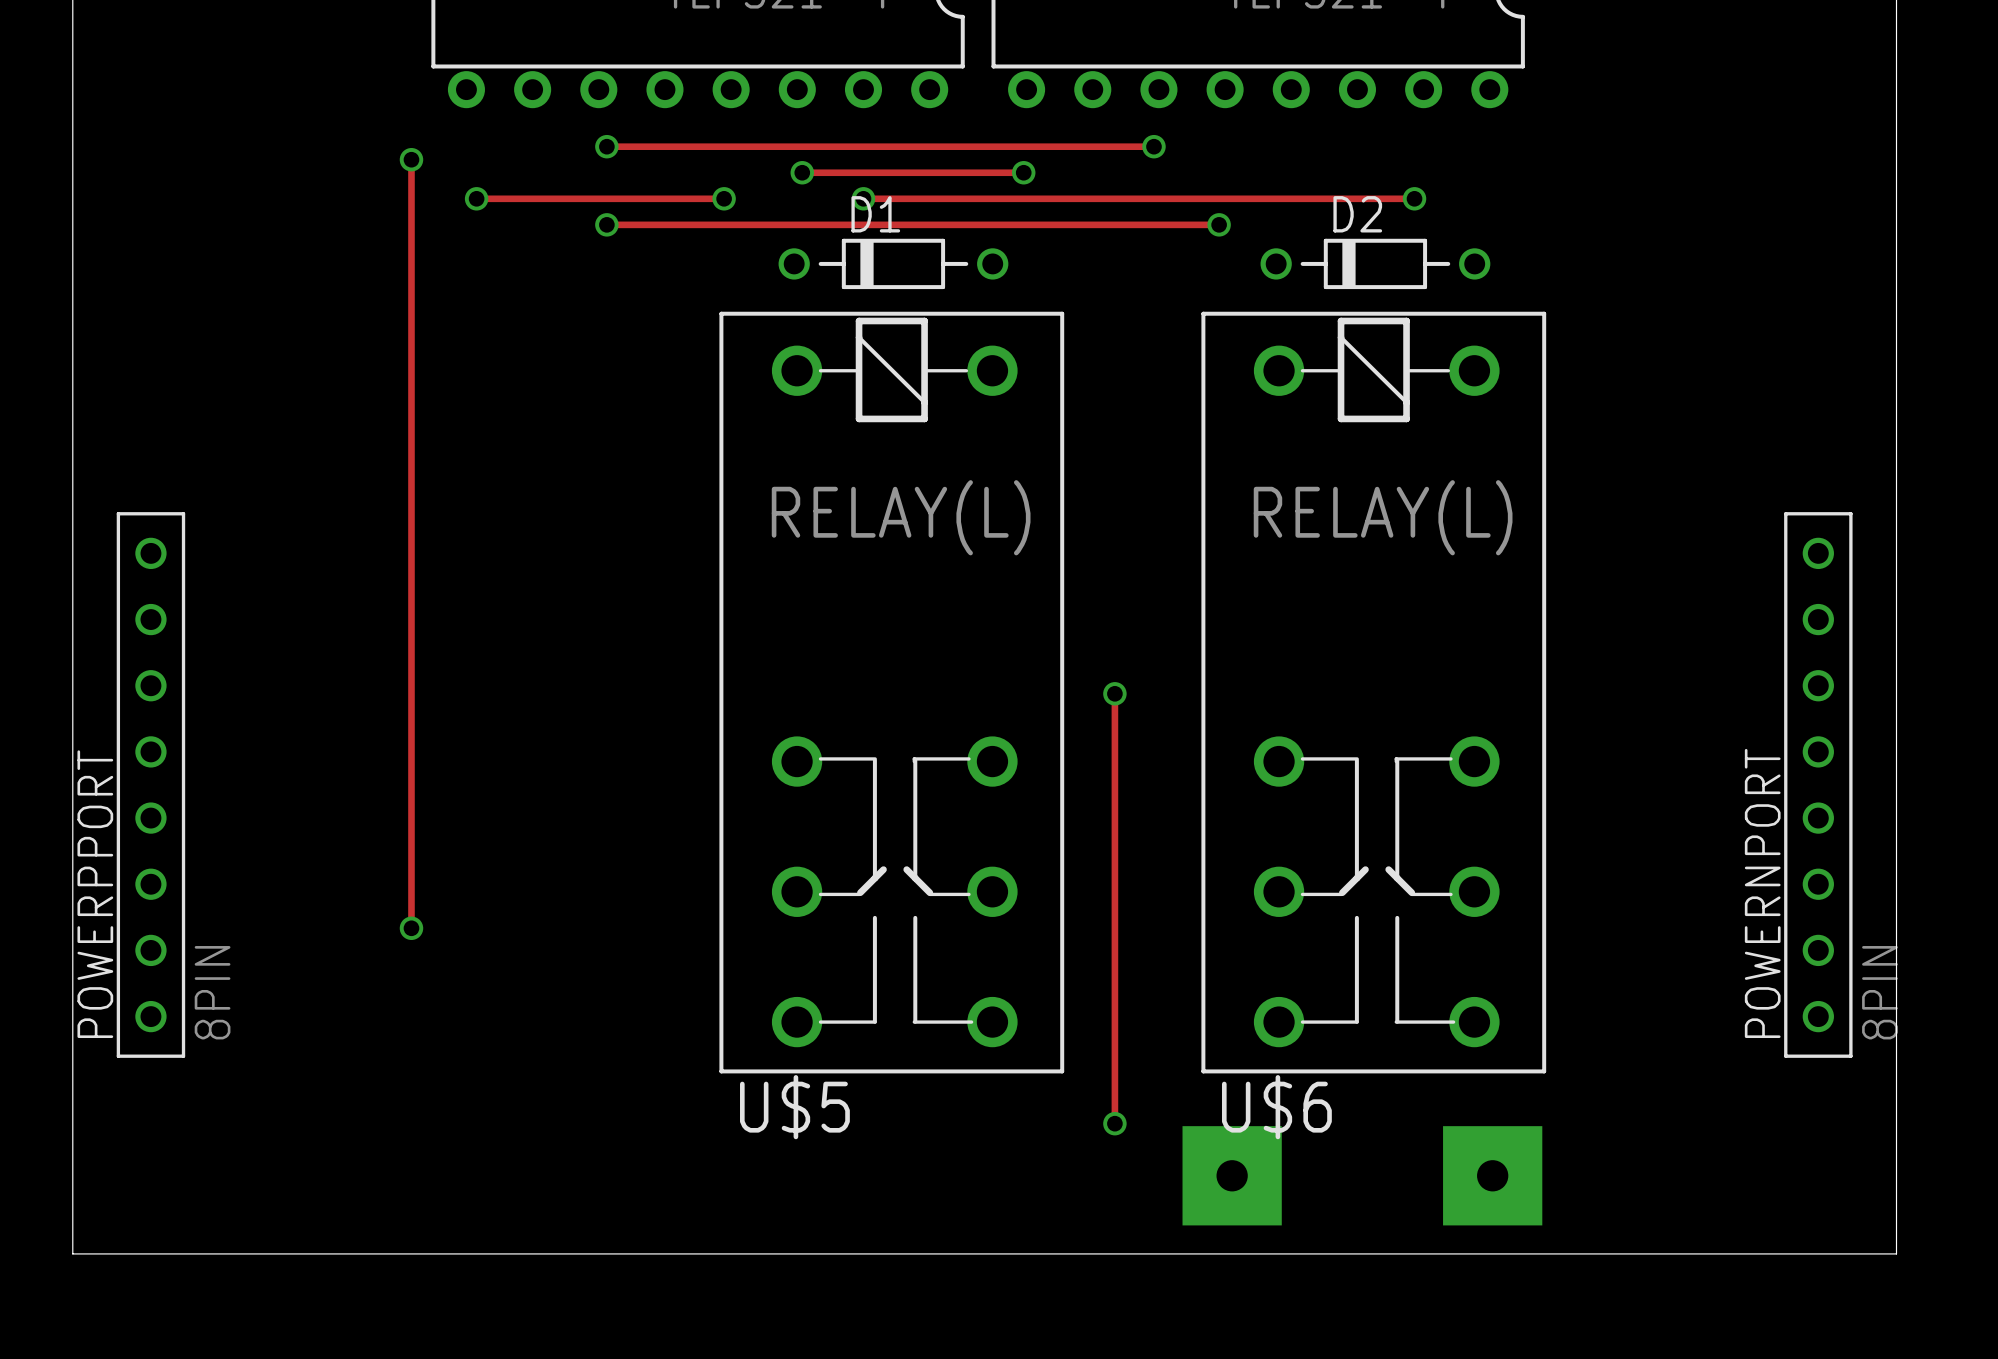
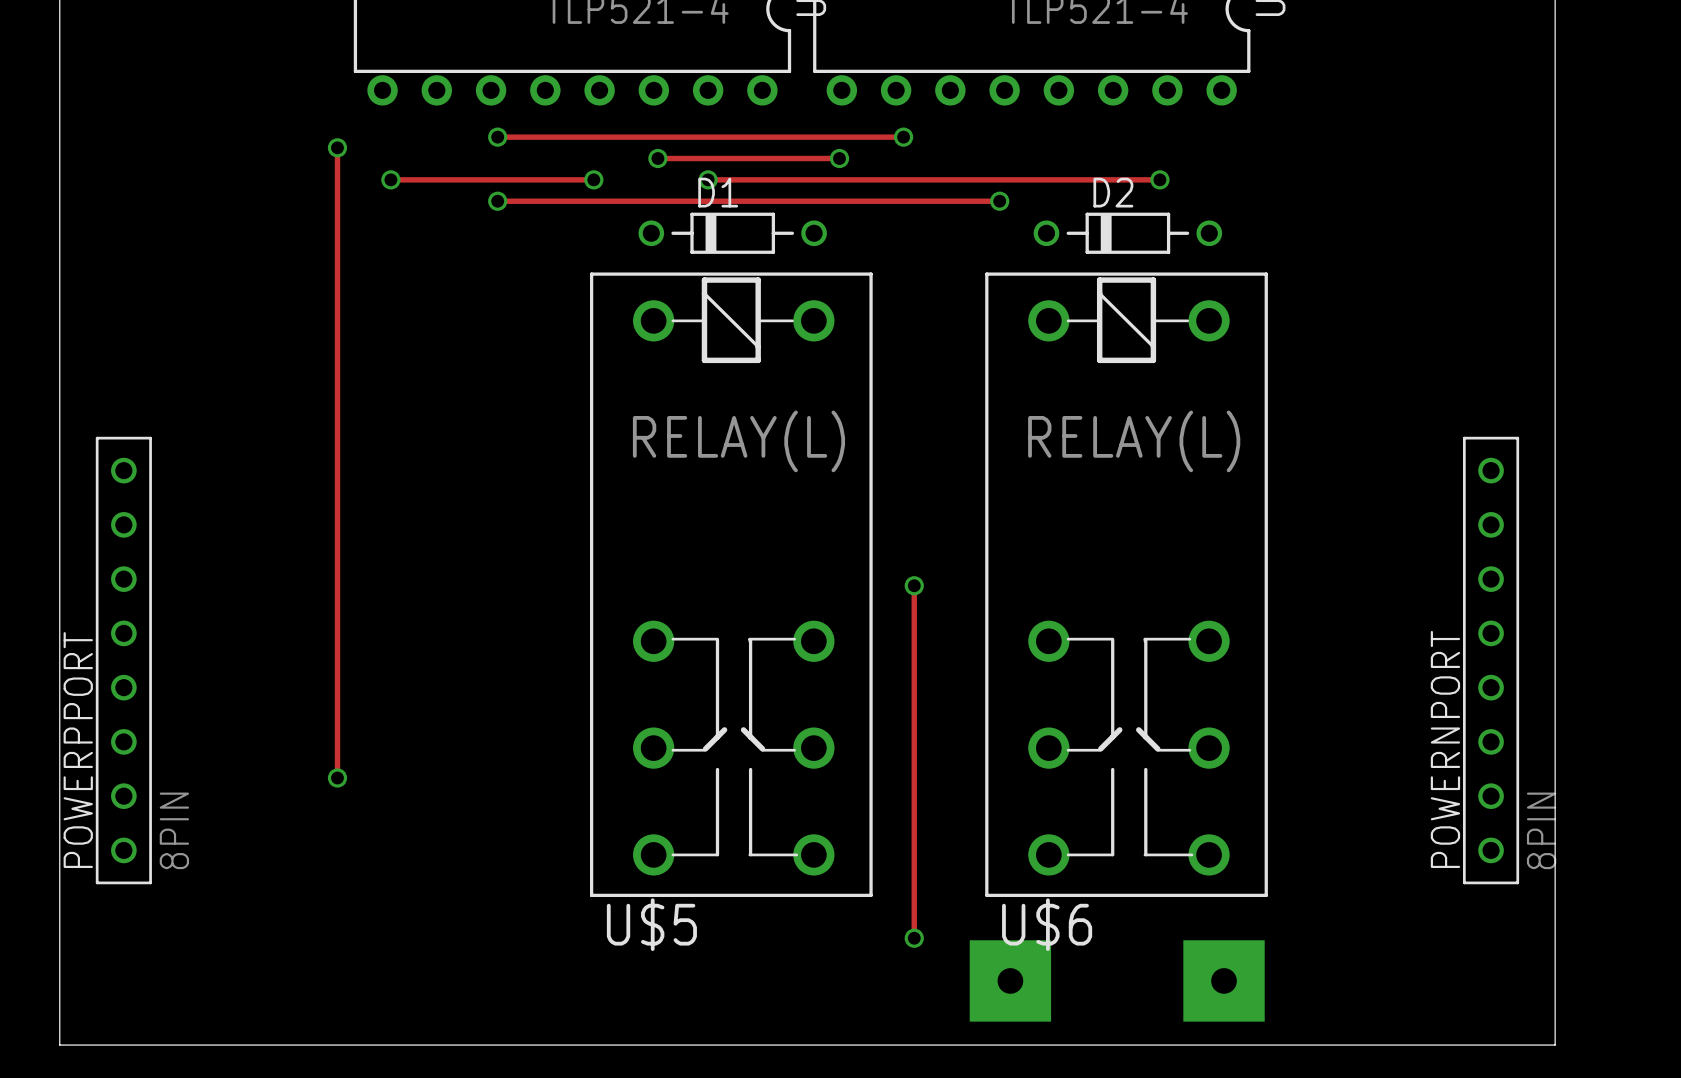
track: (1101, 146) (1153, 146) -> none
via position: (1153, 146) -> (903, 137)

